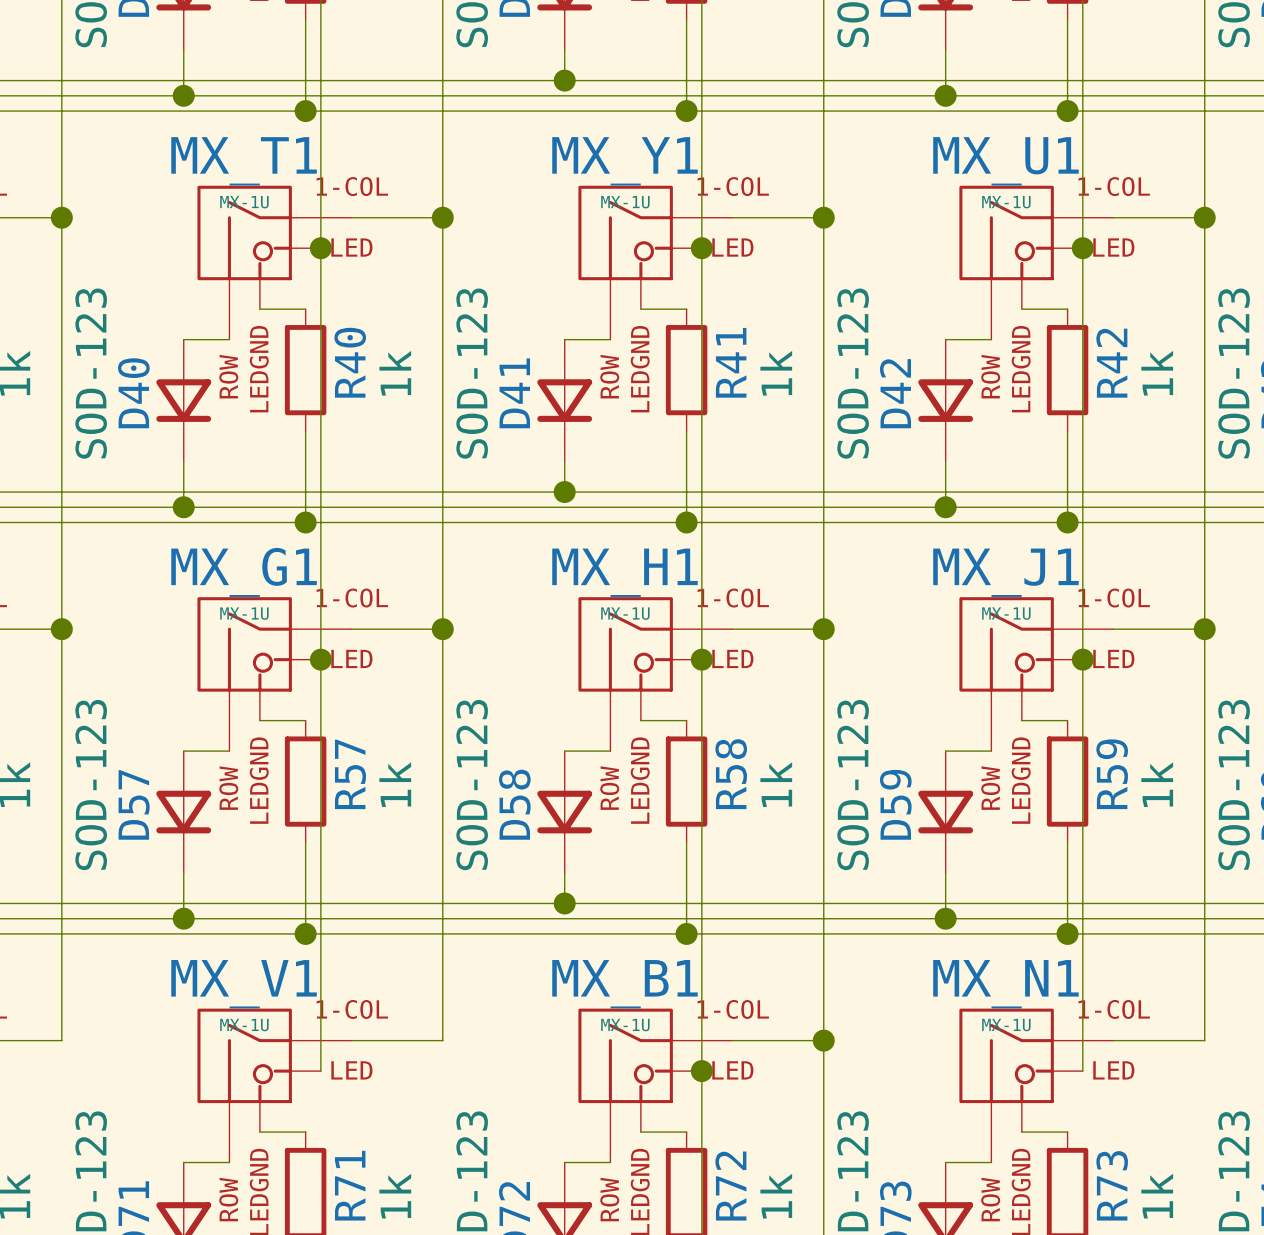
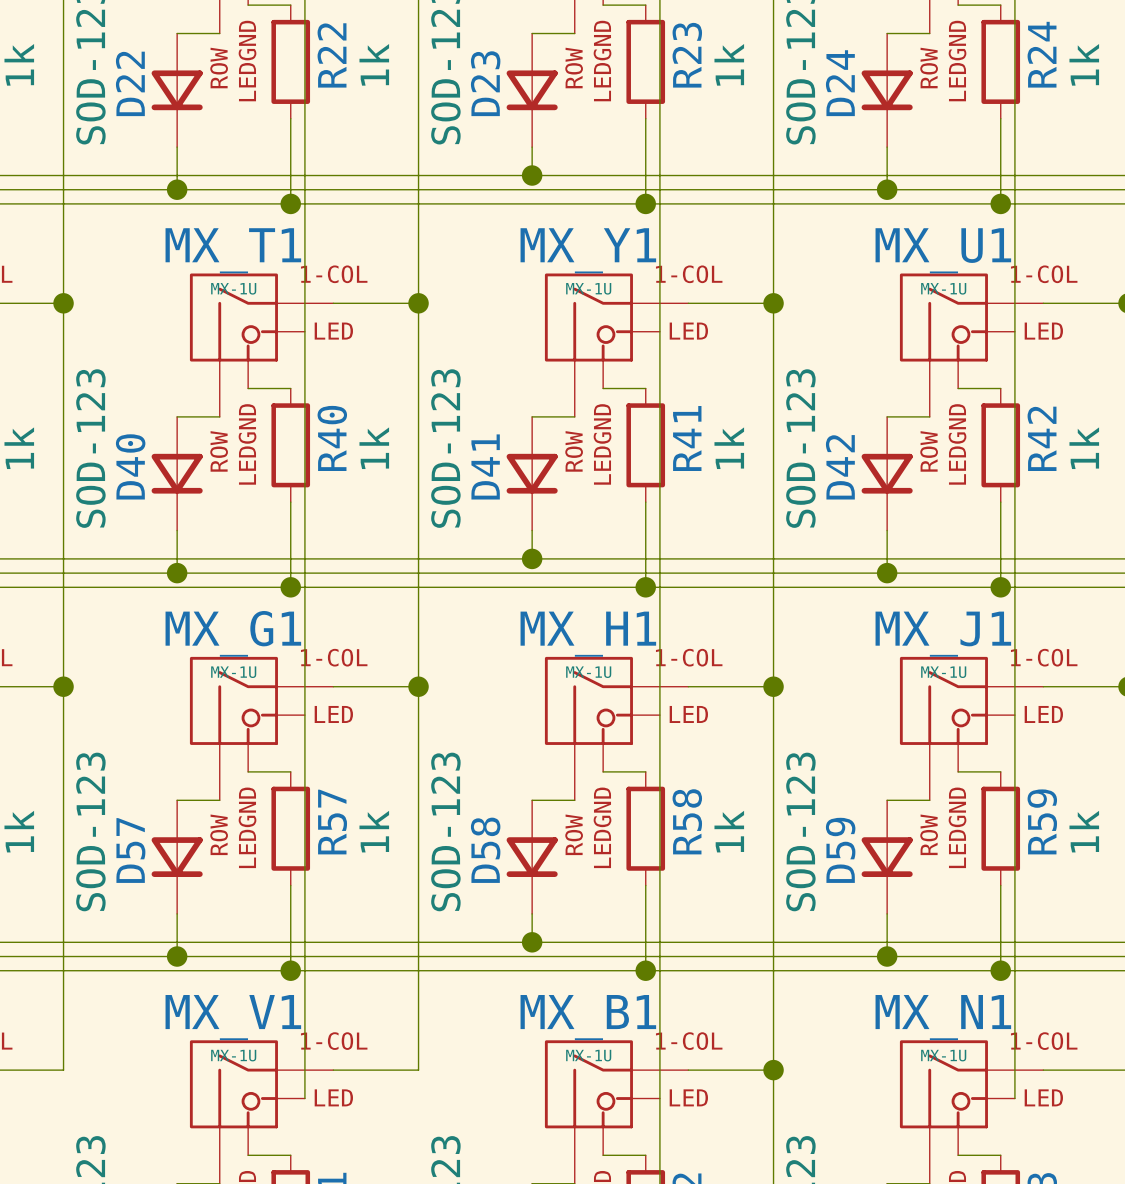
junction: (320, 248) -> none
junction: (701, 248) -> none
junction: (1082, 248) -> none
junction: (320, 659) -> none
junction: (701, 659) -> none
junction: (1082, 659) -> none
junction: (701, 1071) -> none

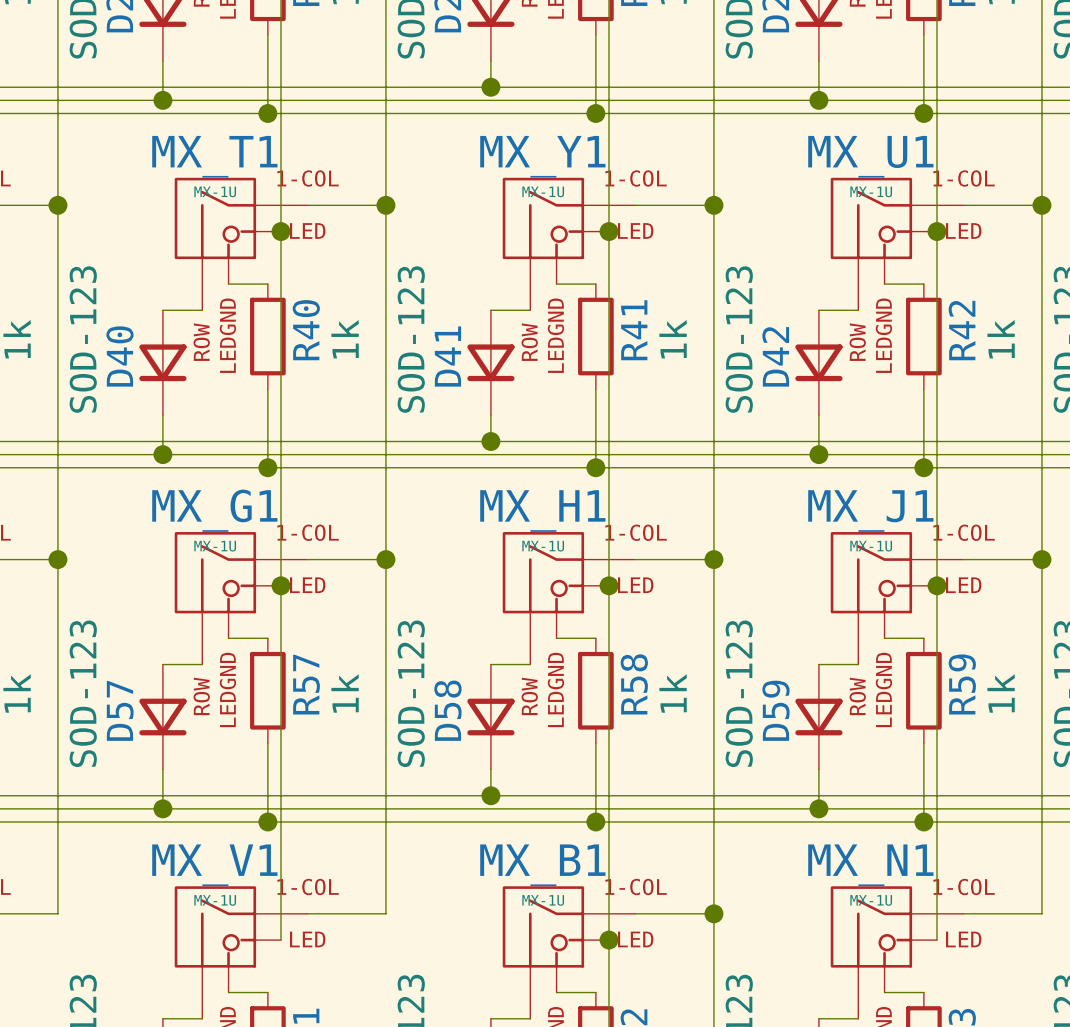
junction: none -> (281, 231)
junction: none -> (609, 231)
junction: none -> (937, 231)
junction: none -> (281, 585)
junction: none -> (609, 585)
junction: none -> (937, 585)
junction: none -> (609, 940)

